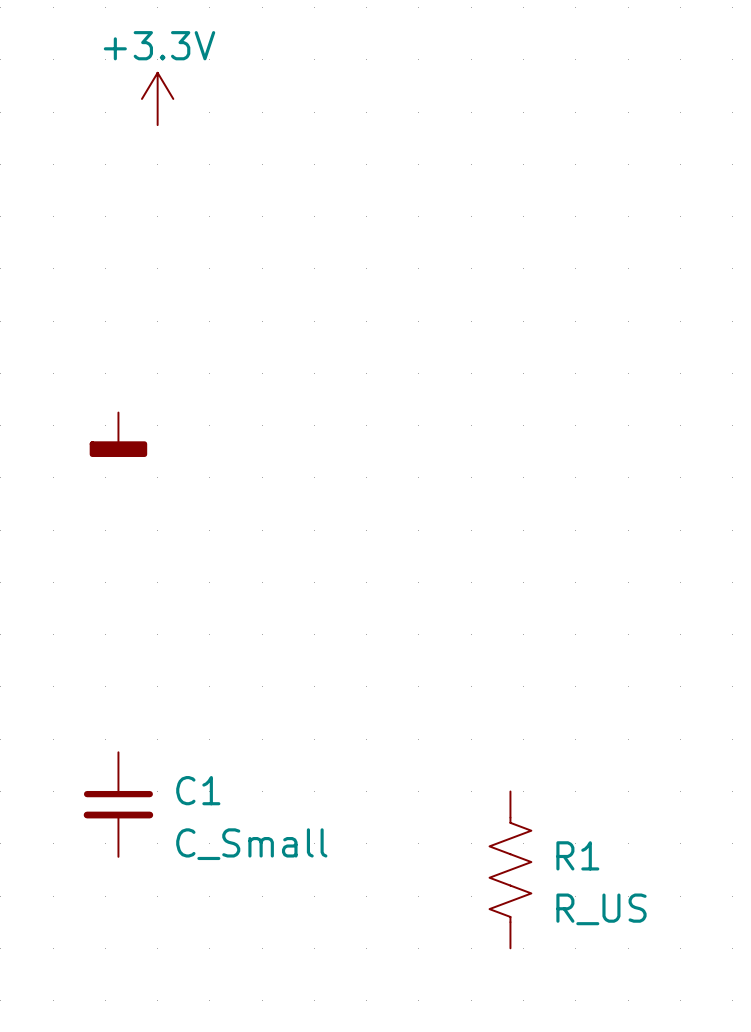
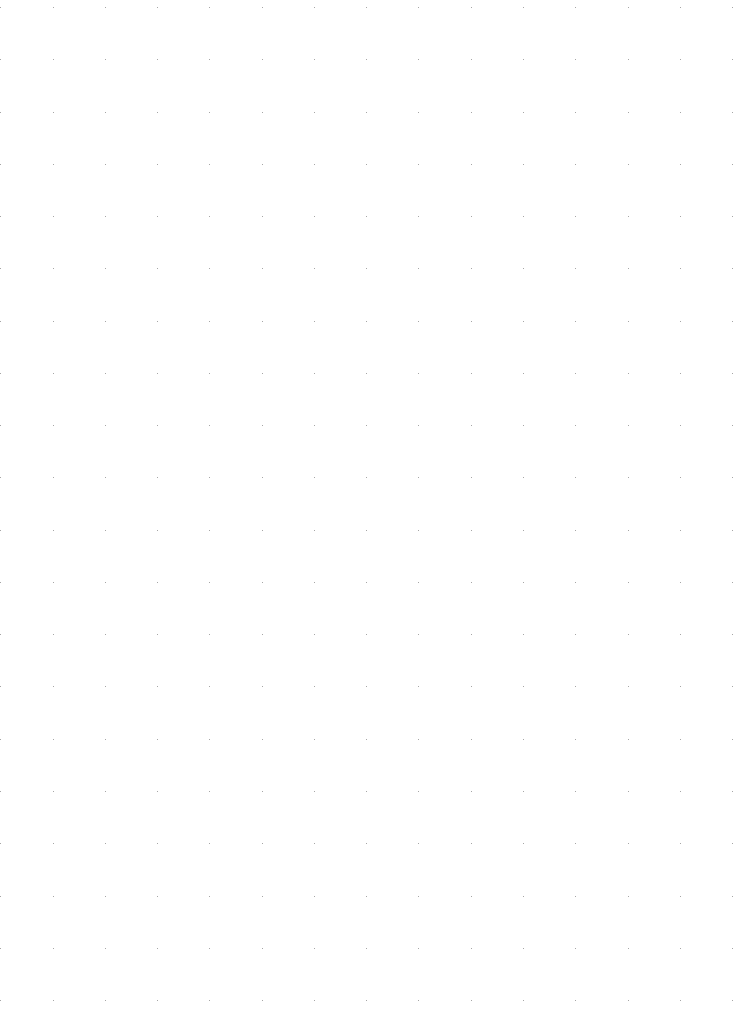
power symbol: +3.3V (157, 98) -> none
power symbol: (118, 434) -> none
C1: C_Small (118, 804) -> none
R1: R_US (510, 869) -> none

